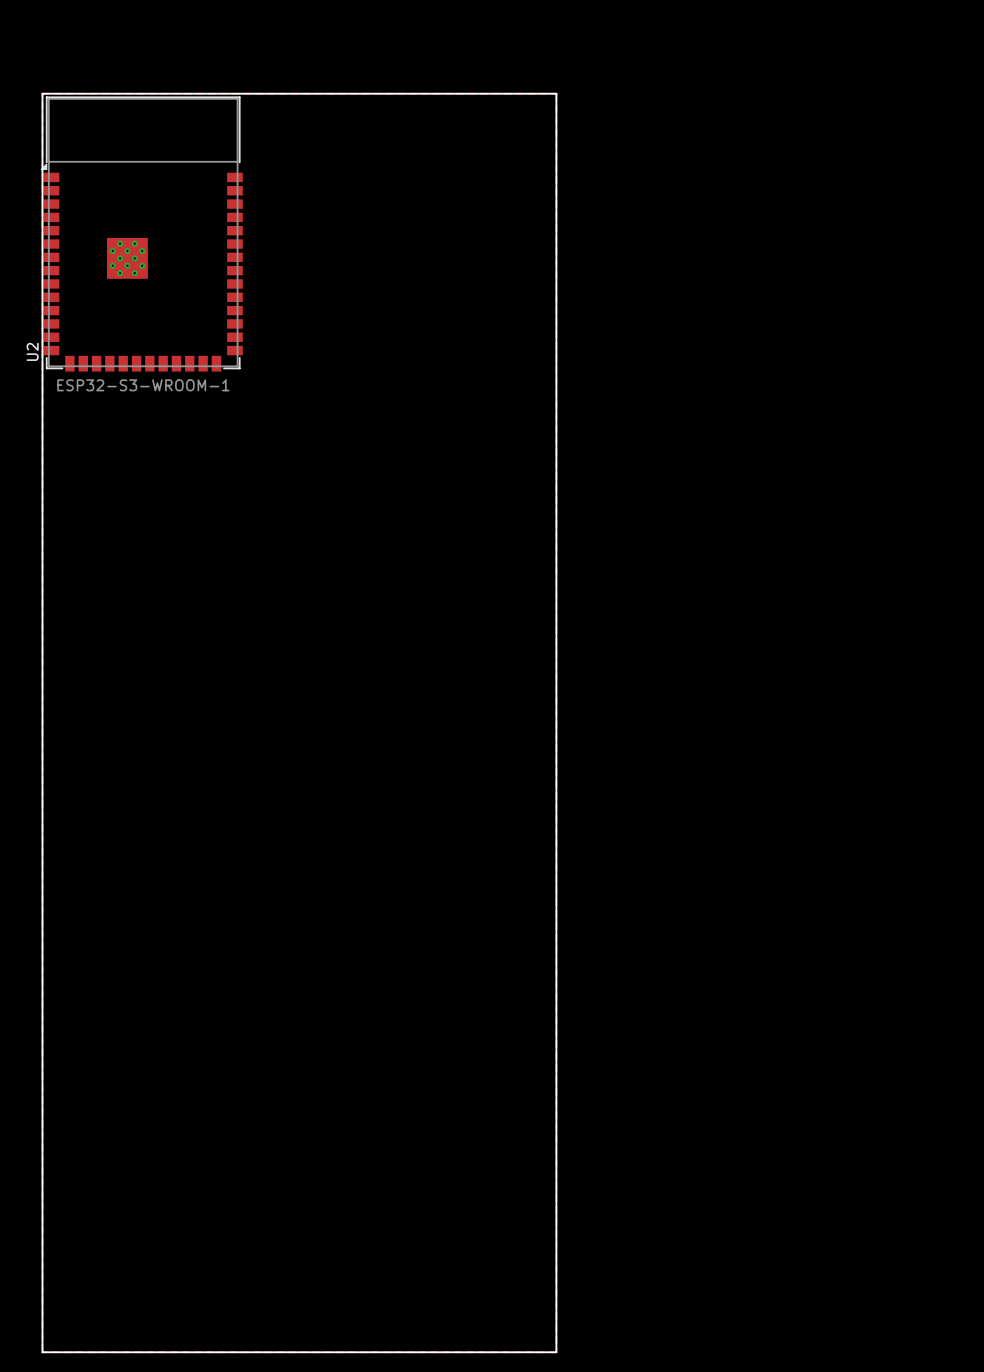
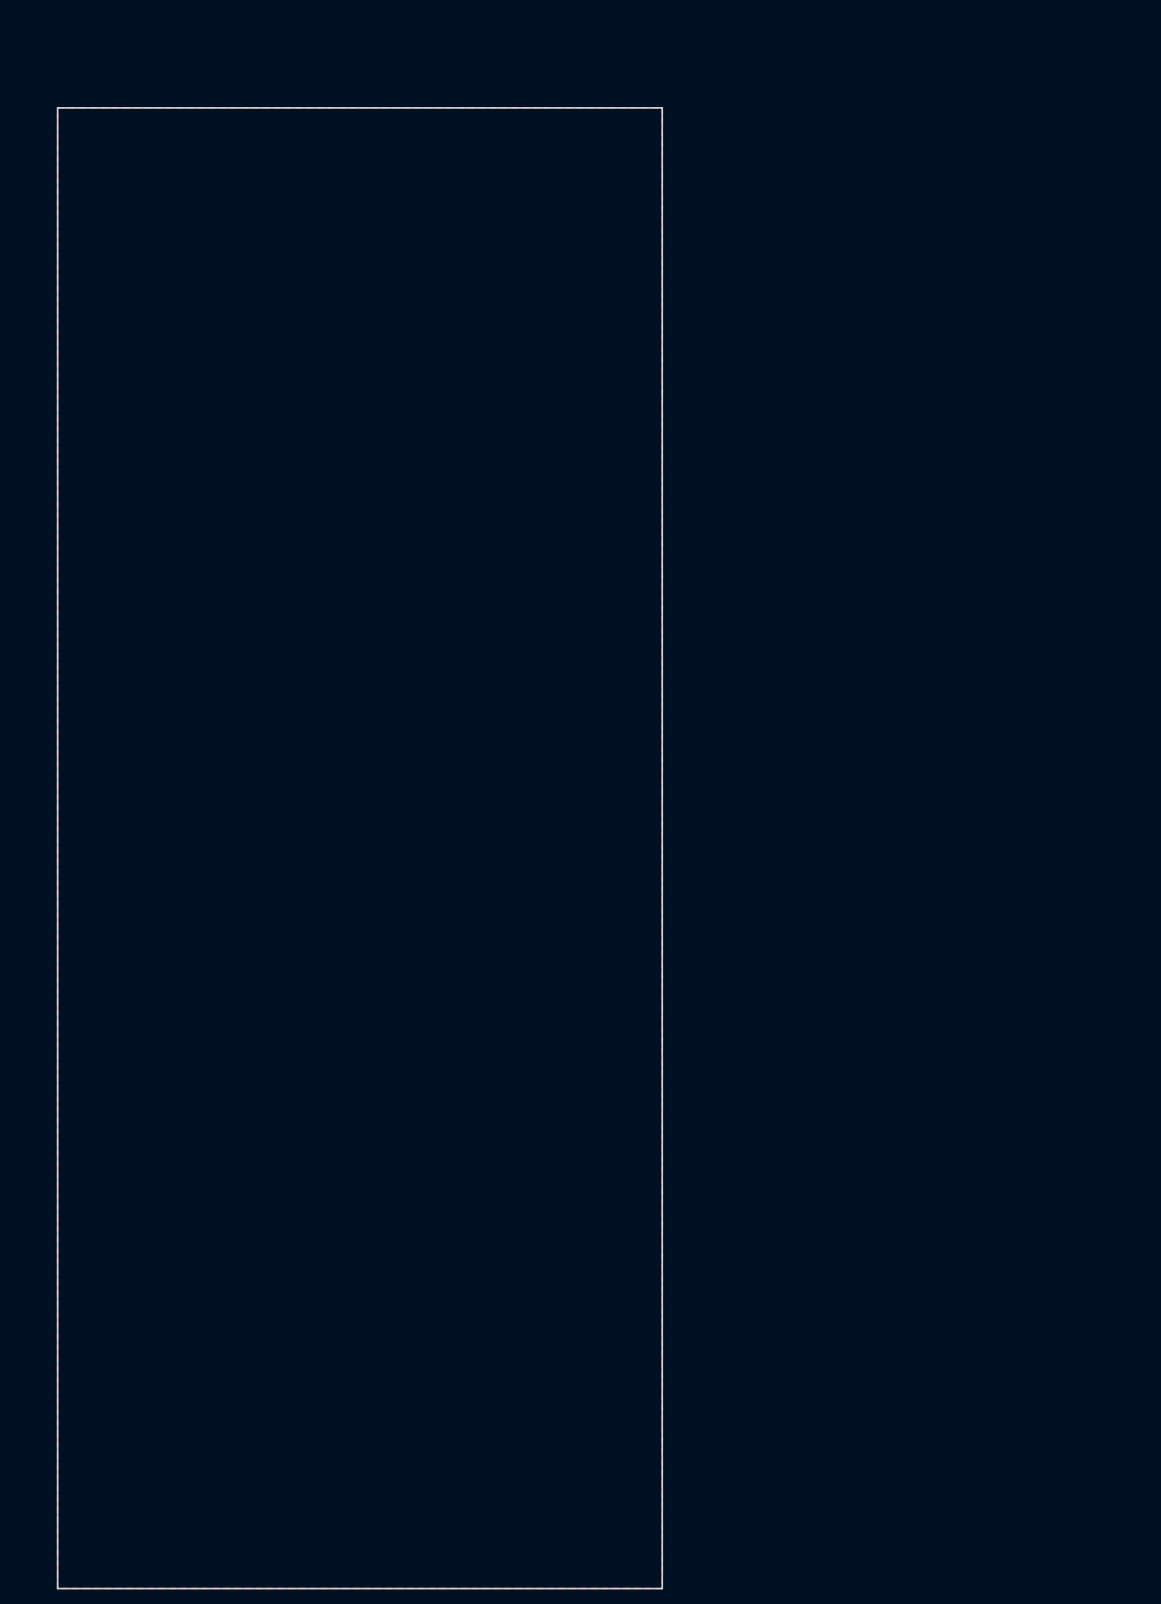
U2: ESP32-S3-WROOM-1 (141, 234) -> none

